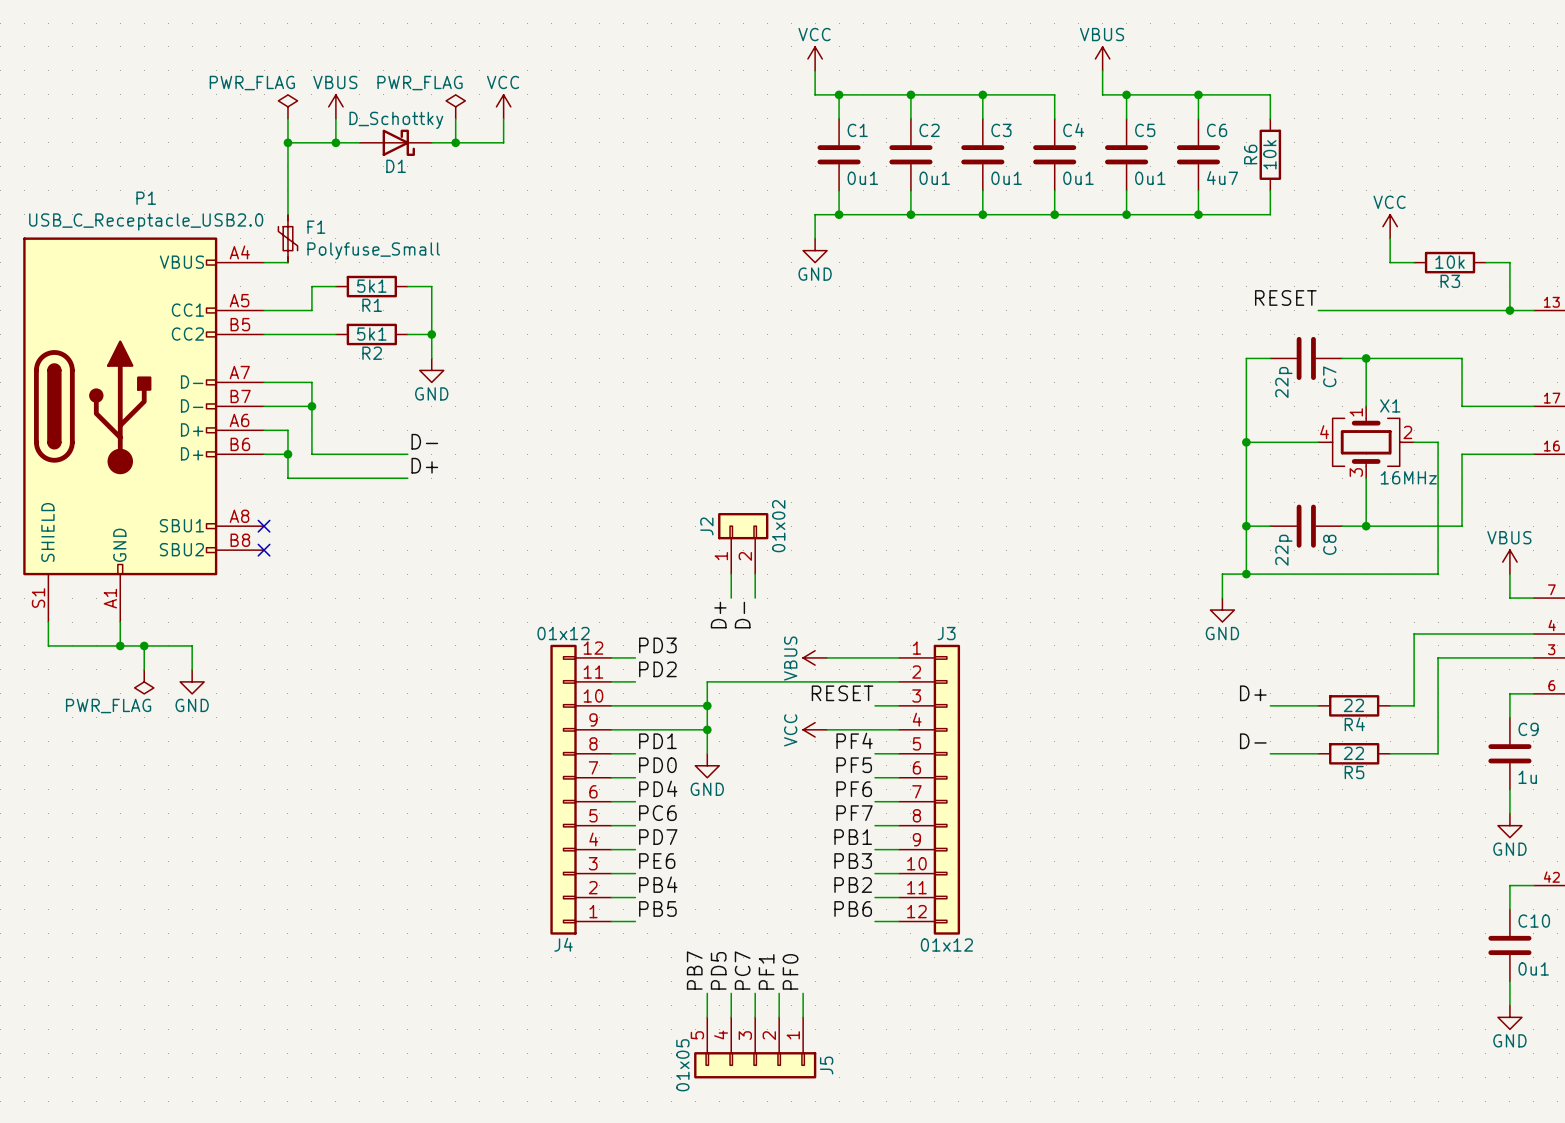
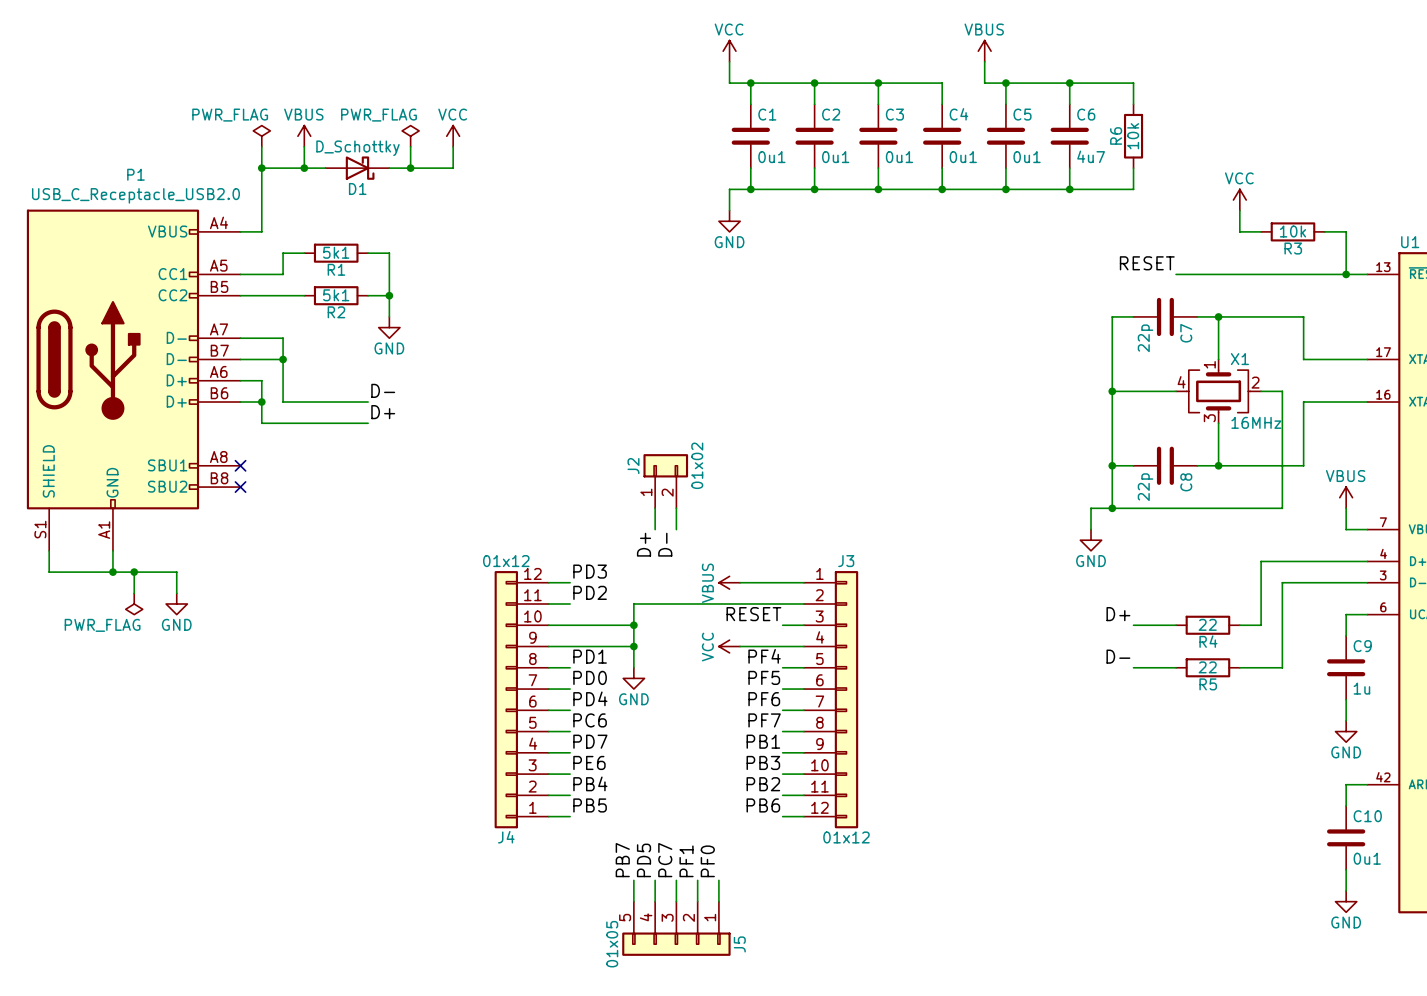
power symbol position: PWR_FLAG (287, 106) -> PWR_FLAG (261, 136)
power symbol position: VBUS (335, 106) -> VBUS (304, 136)
power symbol position: PWR_FLAG (455, 106) -> PWR_FLAG (410, 136)
power symbol position: VCC (503, 106) -> VCC (453, 136)
wire: (335, 118) (335, 142) -> (304, 146) (304, 168)
wire: (455, 118) (455, 142) -> (410, 146) (410, 168)
wire: (503, 118) (503, 142) (431, 142) -> (453, 146) (453, 168) (389, 168)
wire: (287, 142) (359, 142) -> (261, 168) (325, 168)
junction: (287, 142) -> none
junction: (335, 142) -> none
D1 position: (395, 142) -> (357, 168)
junction position: (455, 142) -> (410, 168)
junction: none -> (261, 168)
junction: none -> (304, 168)
F1: Polyfuse_Small (287, 238) -> none

